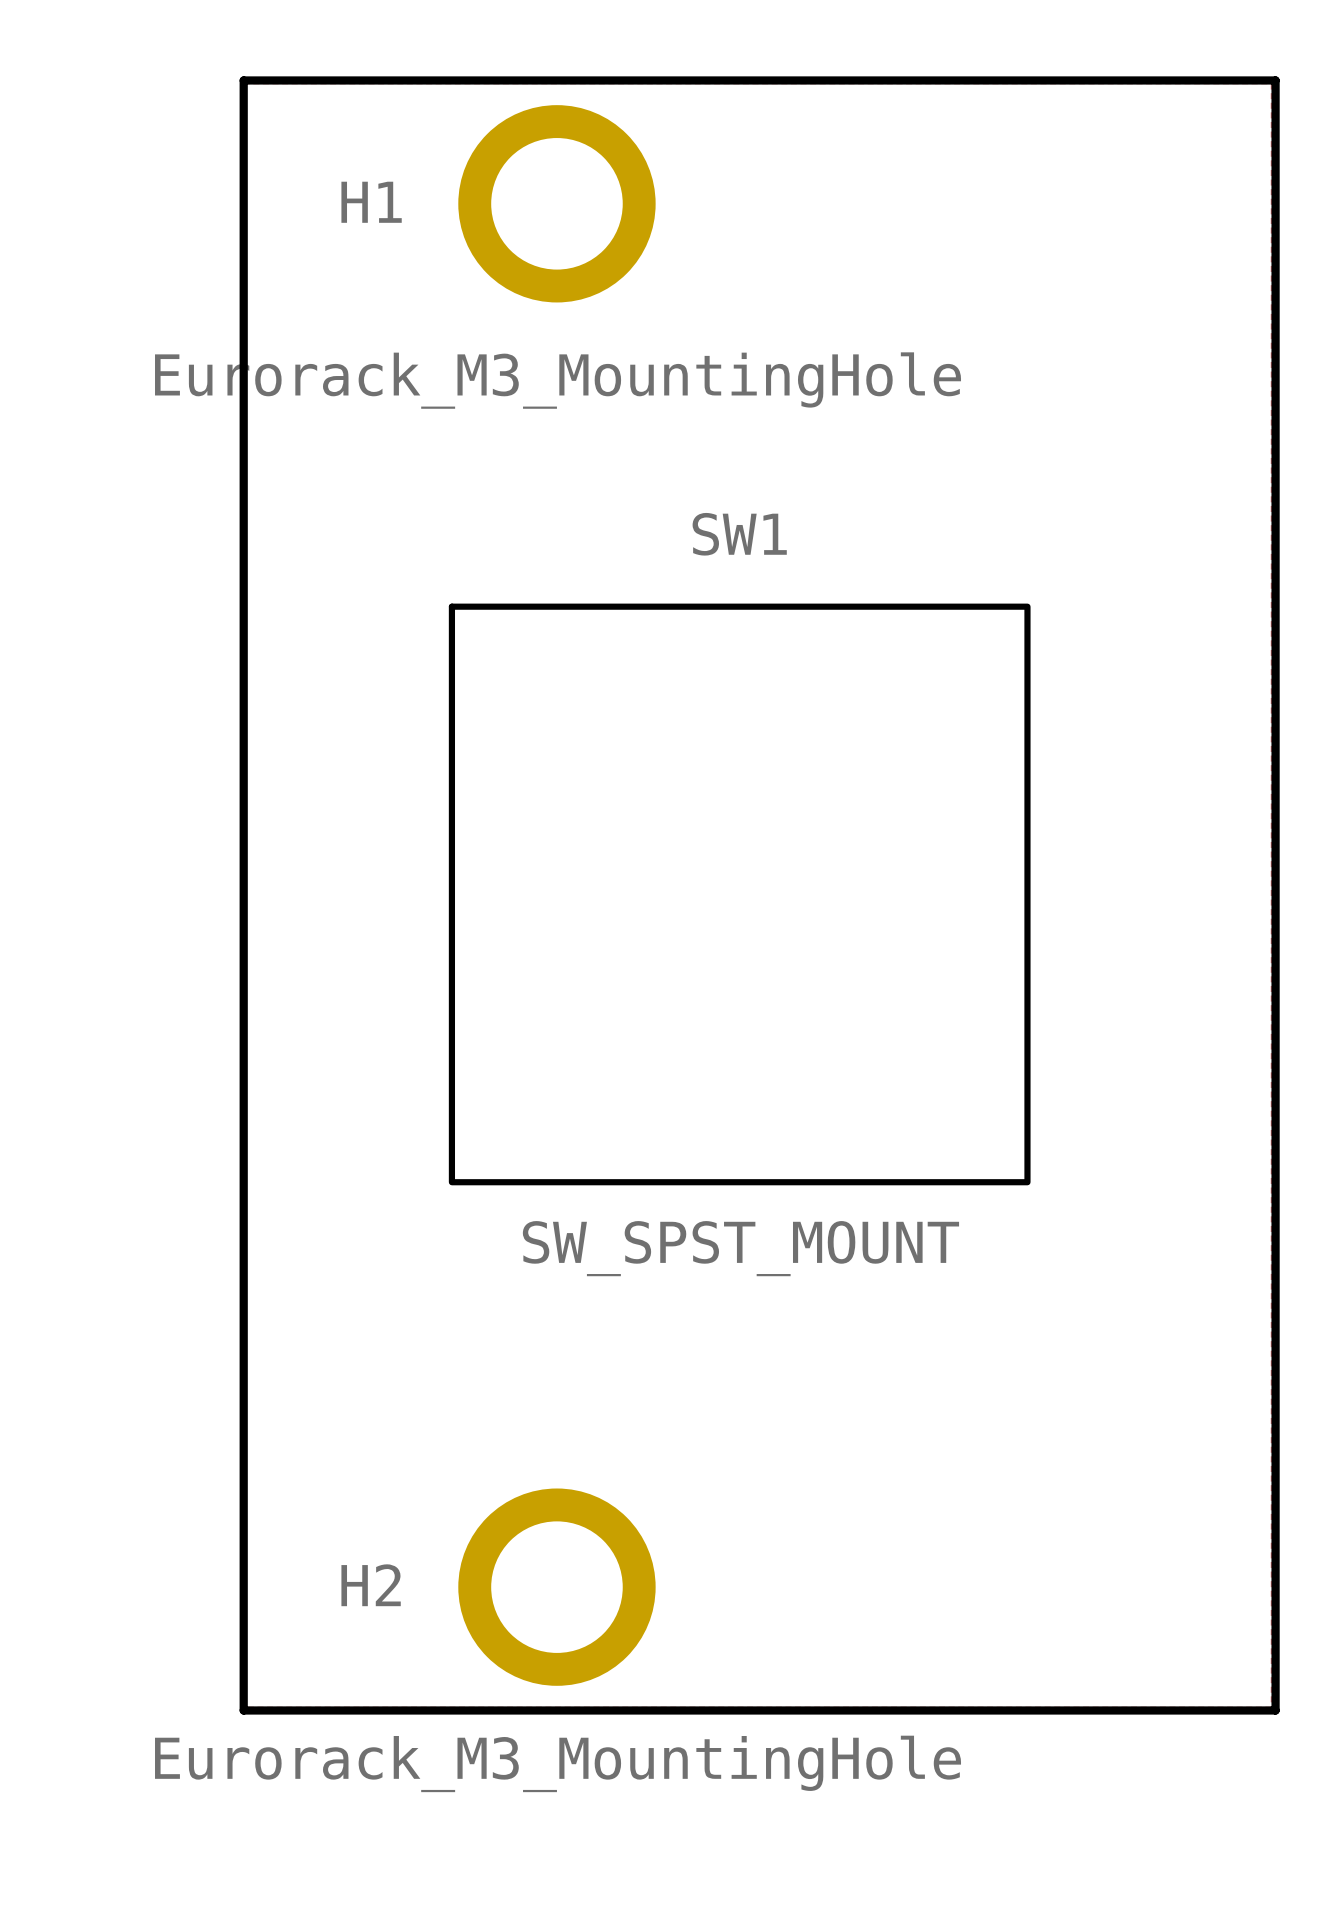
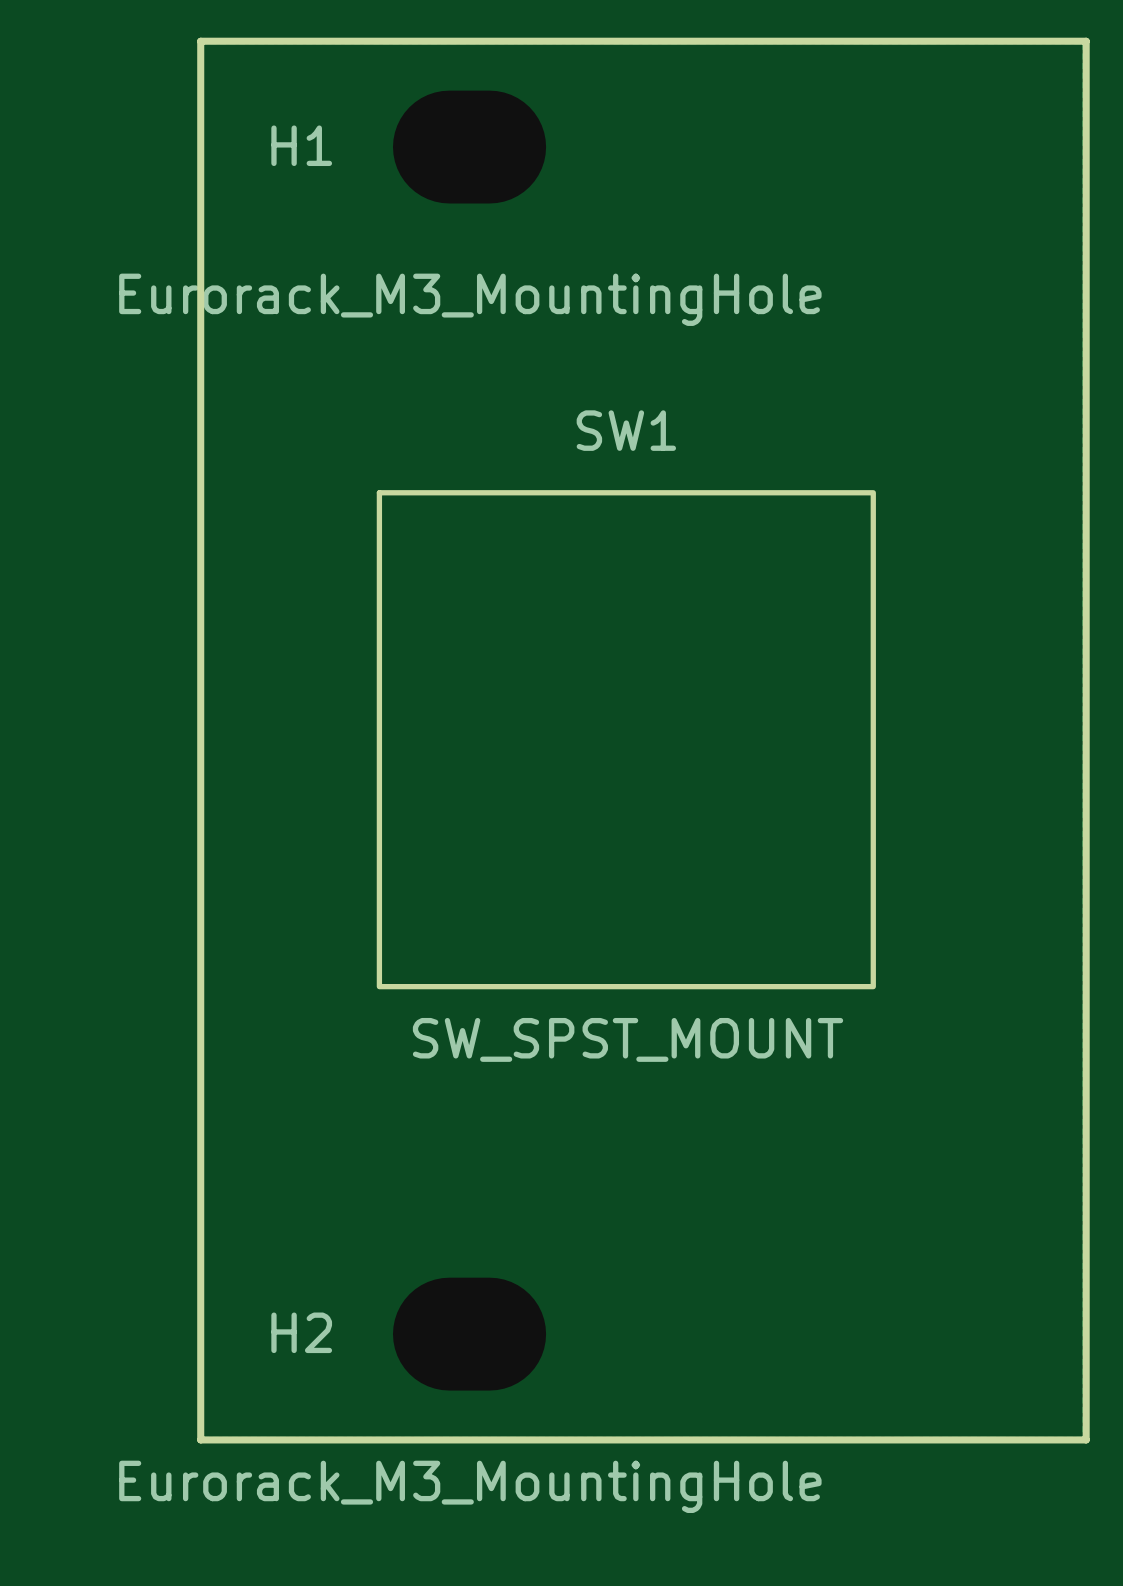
H1 footprint: [458, 105, 656, 303] -> [392, 90, 547, 204]
H2 footprint: [458, 1488, 656, 1686] -> [392, 1277, 547, 1391]

